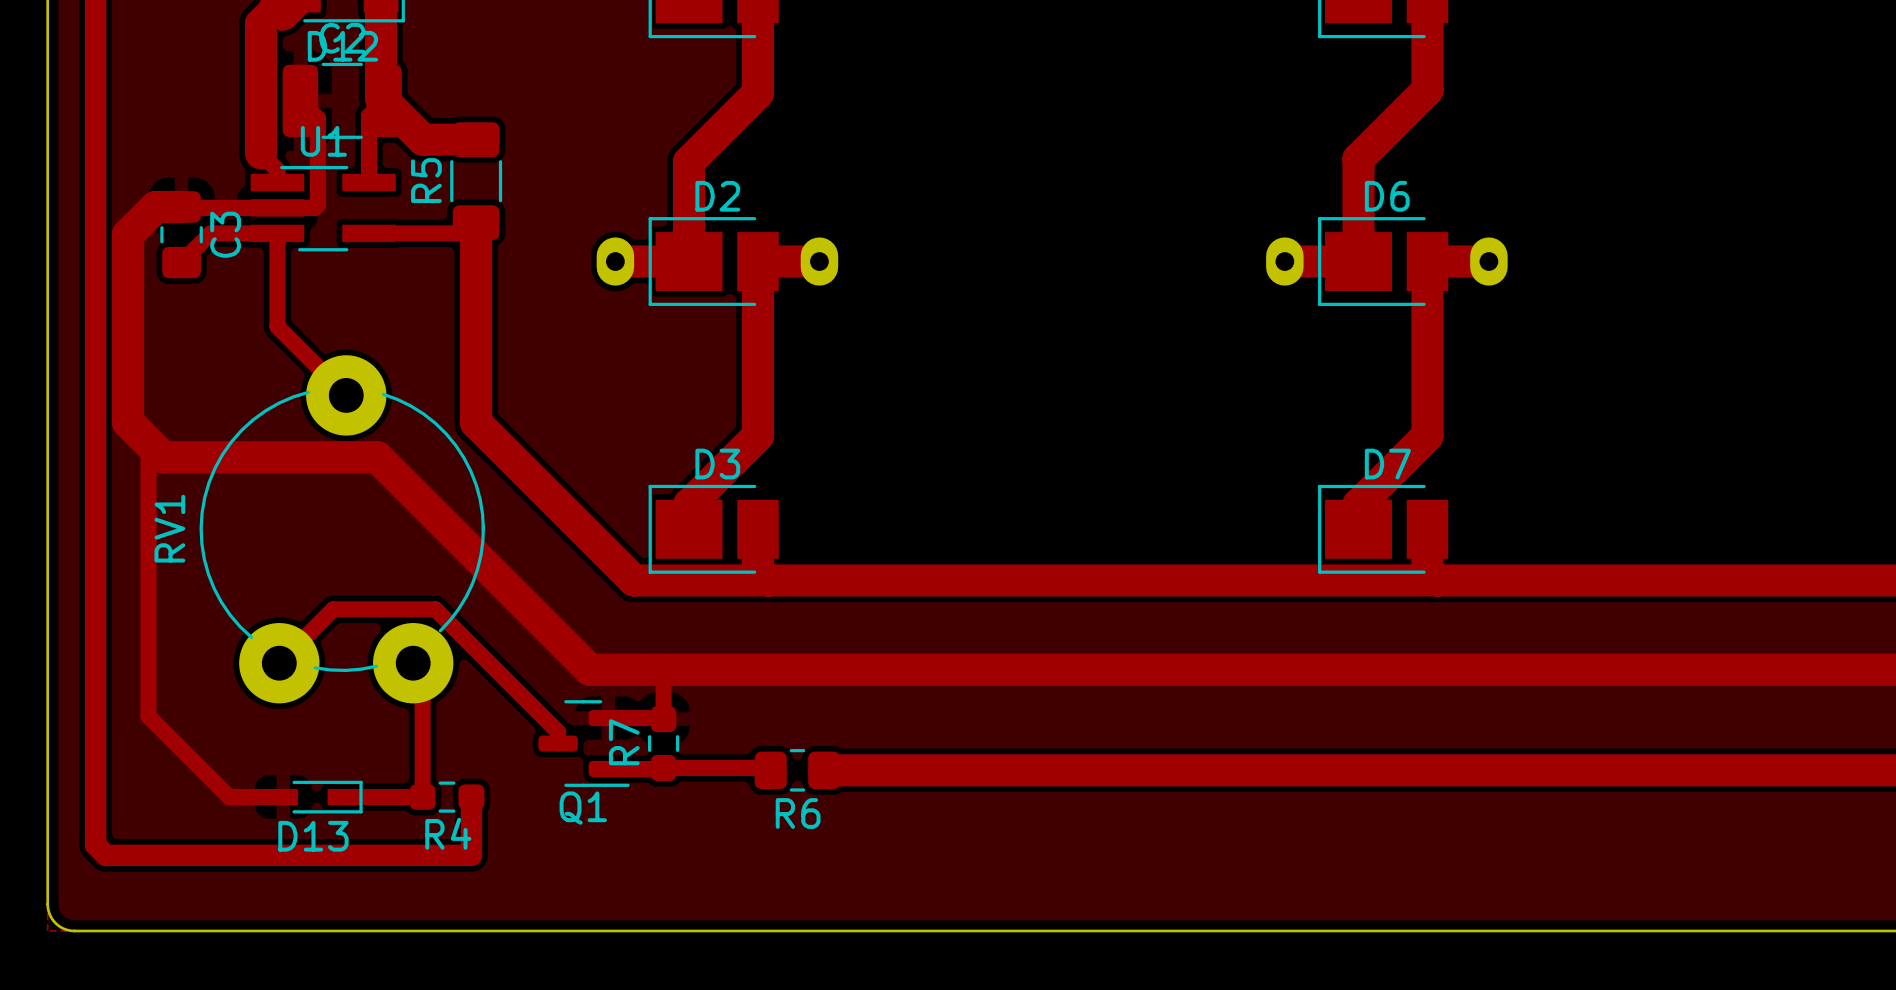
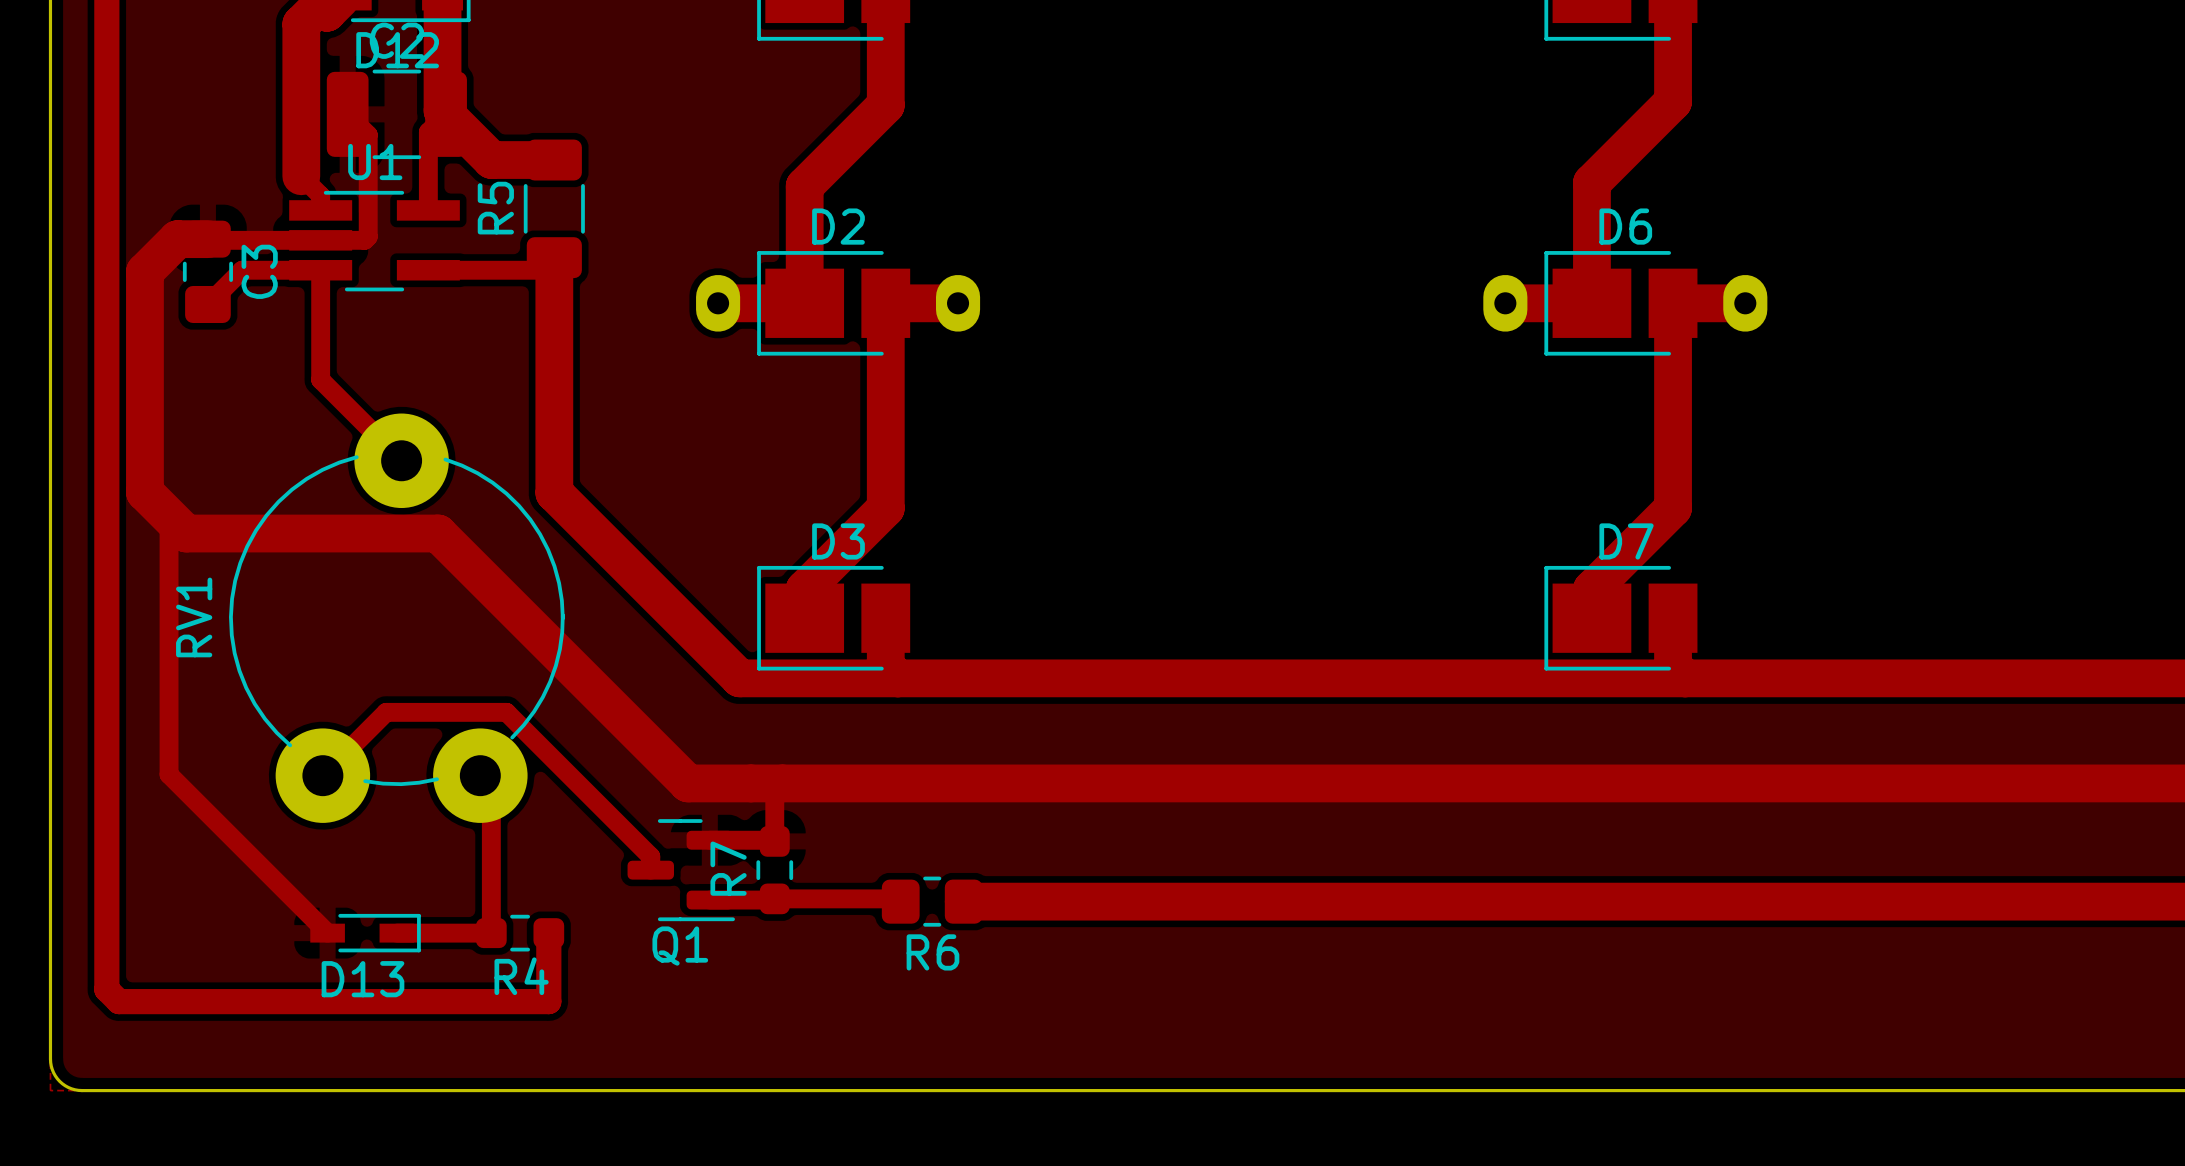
top track: (148, 662) (148, 716) (229, 797) (283, 797) -> (169, 774) (327, 933)

